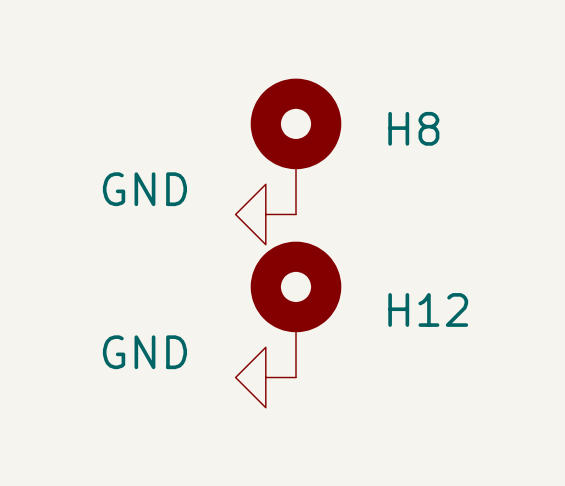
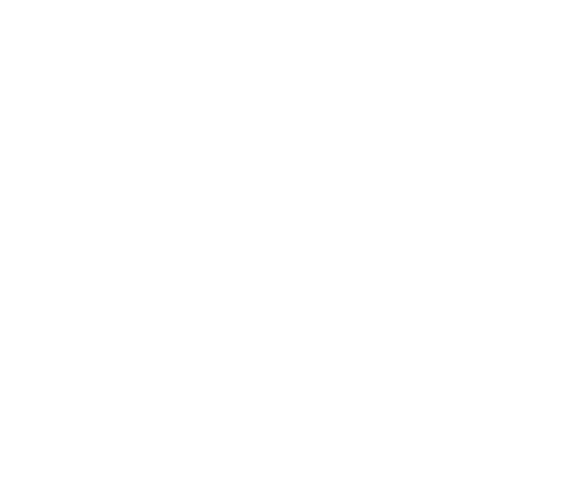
H8: (296, 146) -> none
power symbol: GND (265, 214) -> none
H12: (296, 309) -> none
power symbol: GND (265, 377) -> none

